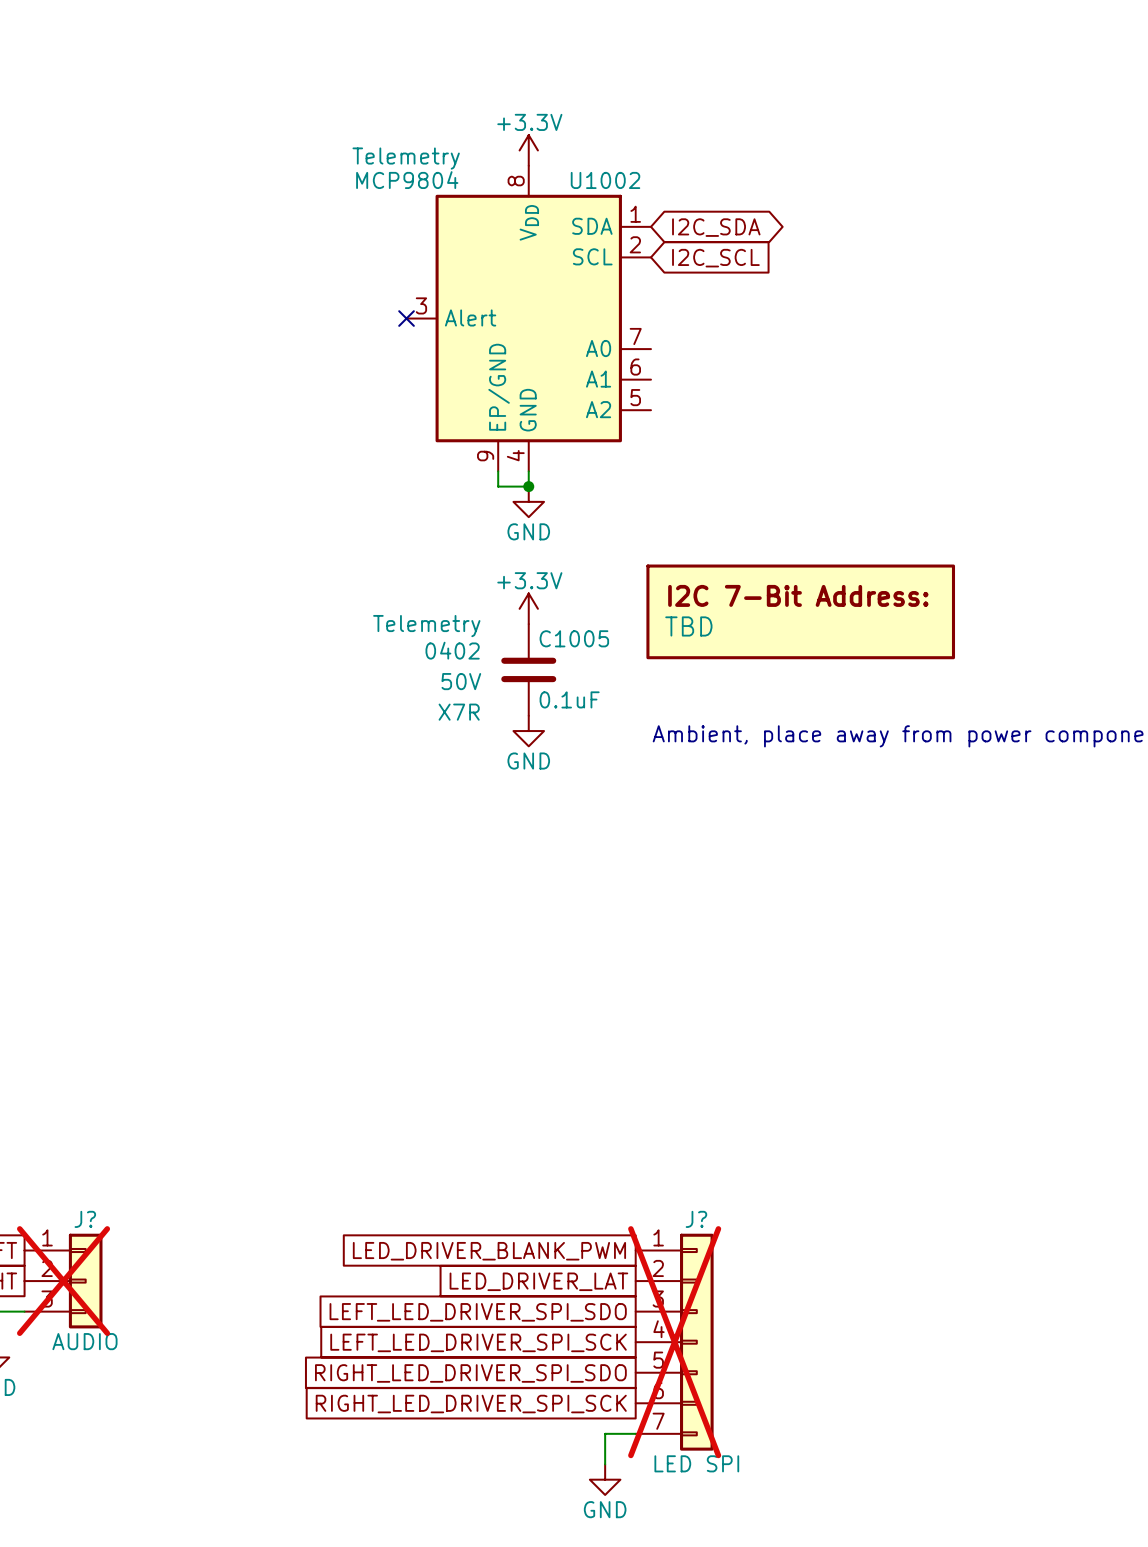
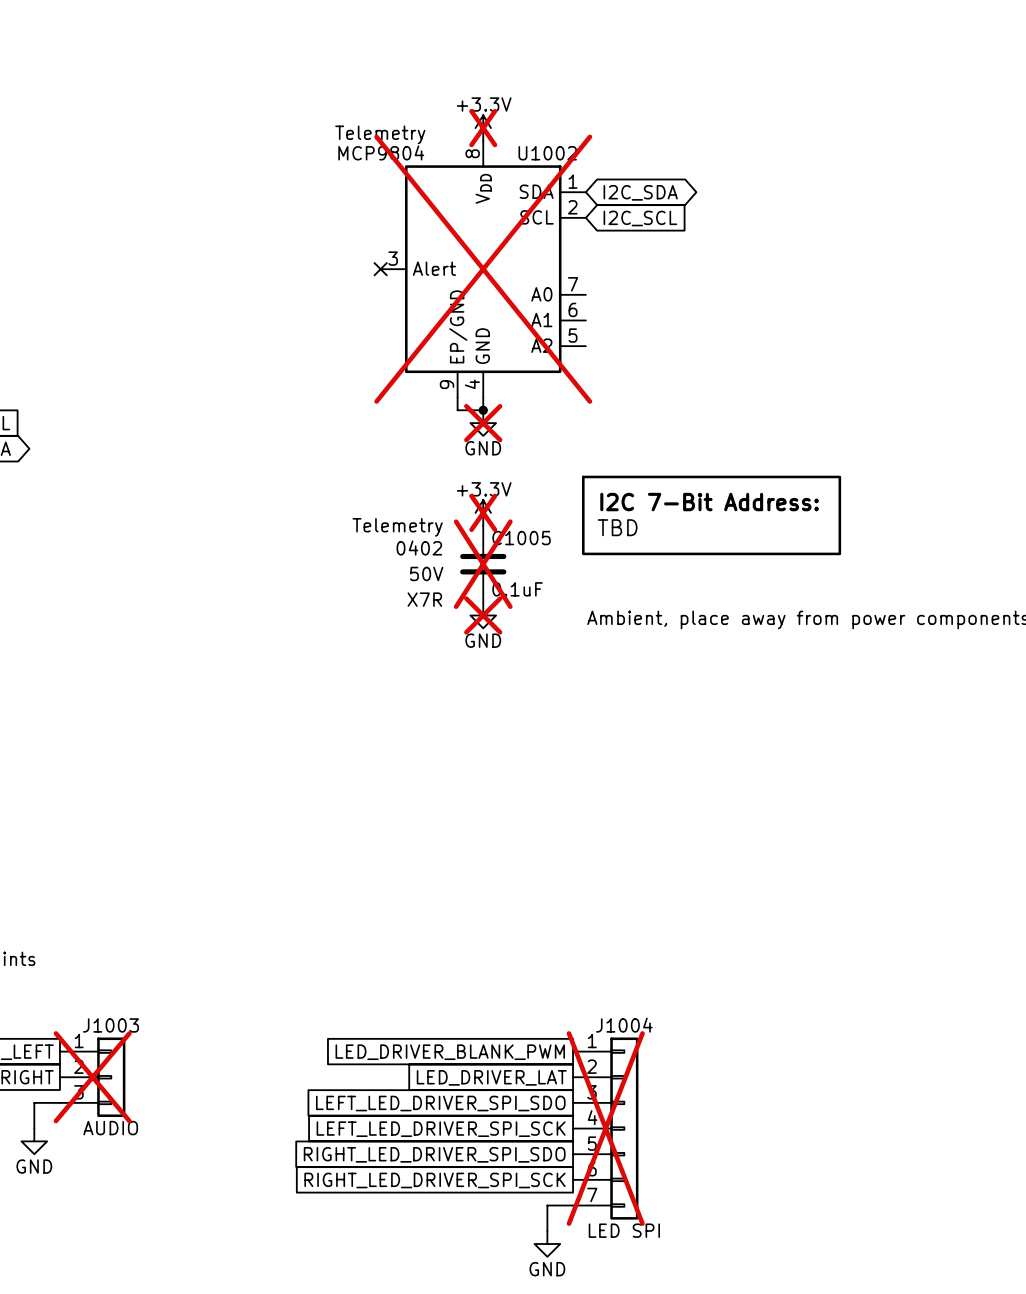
power symbol do-not-place cross: none -> (483, 128)
U1002 do-not-place cross: none -> (483, 269)
power symbol do-not-place cross: none -> (483, 423)
power symbol do-not-place cross: none -> (483, 512)
C1005 do-not-place cross: none -> (483, 564)
power symbol do-not-place cross: none -> (483, 615)
J? name: J? (85, 1219) -> J1003 (110, 1025)
J? name: J? (696, 1219) -> J1004 (624, 1025)

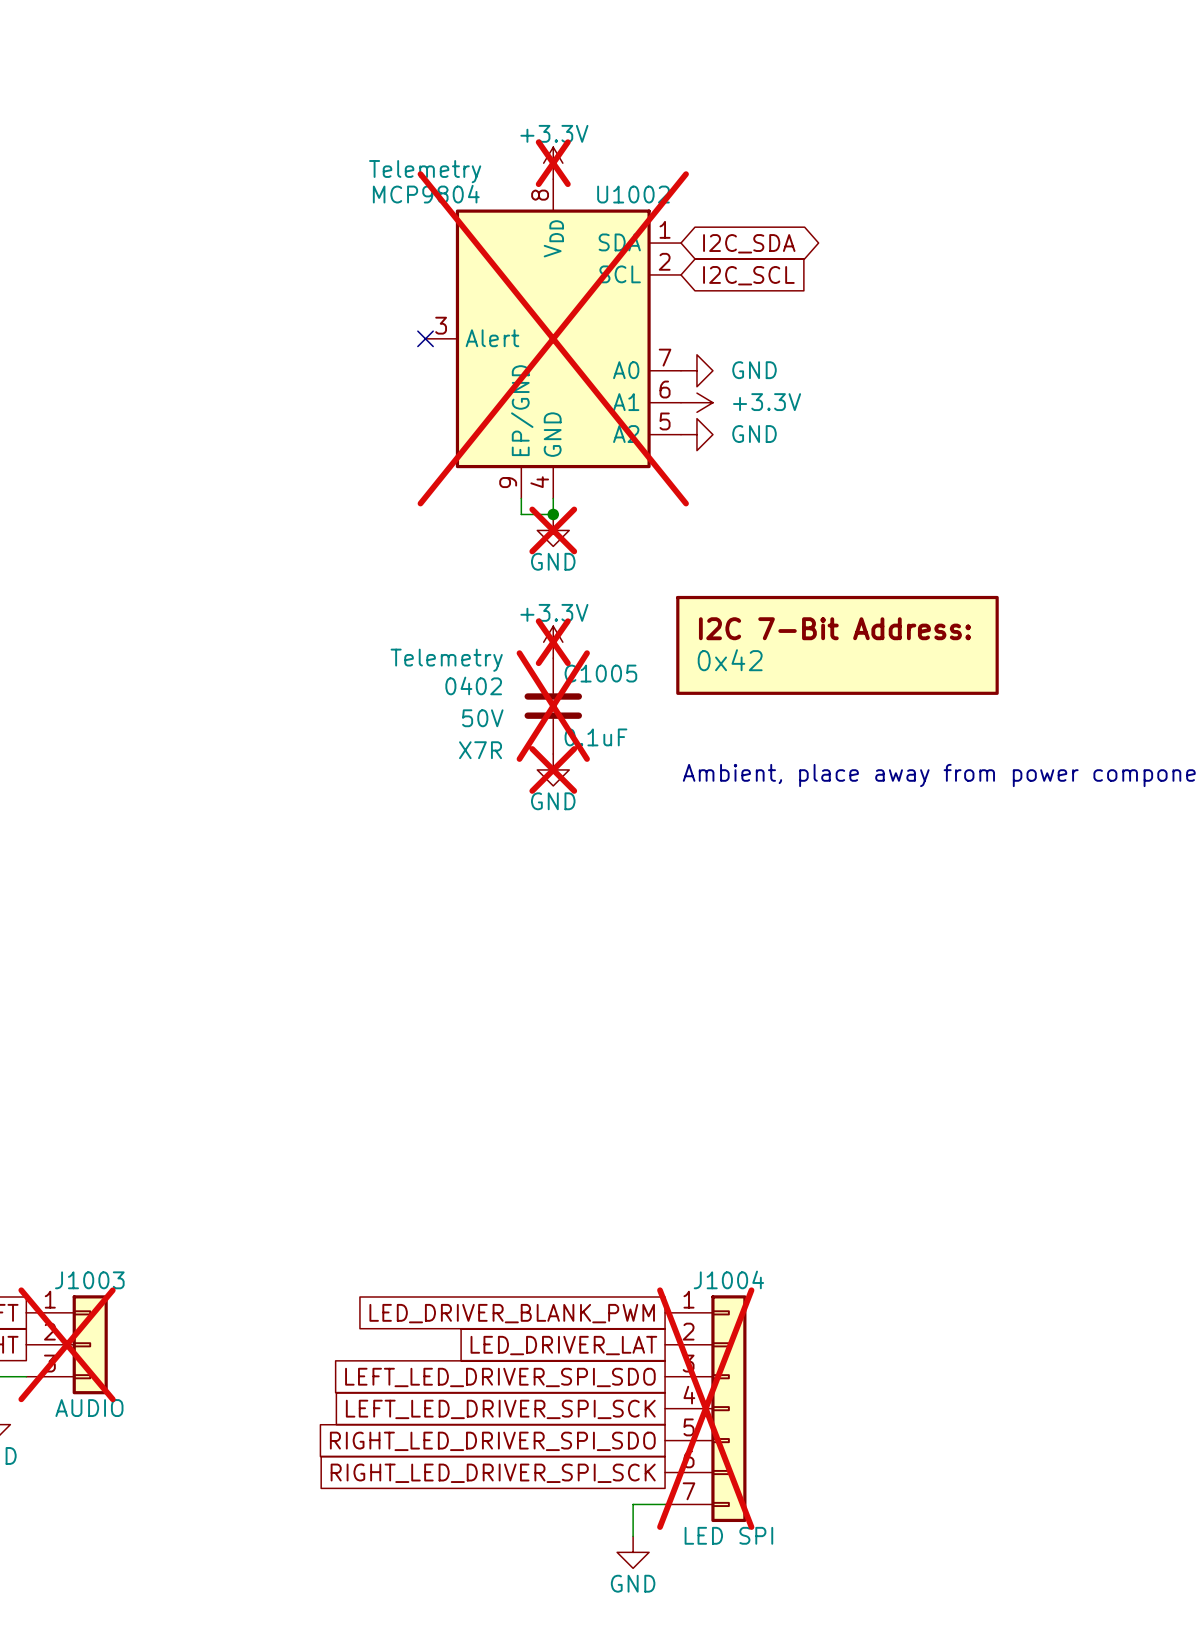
power symbol: none -> GND (696, 370)
power symbol: none -> +3.3V (696, 402)
power symbol: none -> GND (696, 434)
part value: TBD (617, 527) -> 0x42 (730, 660)

